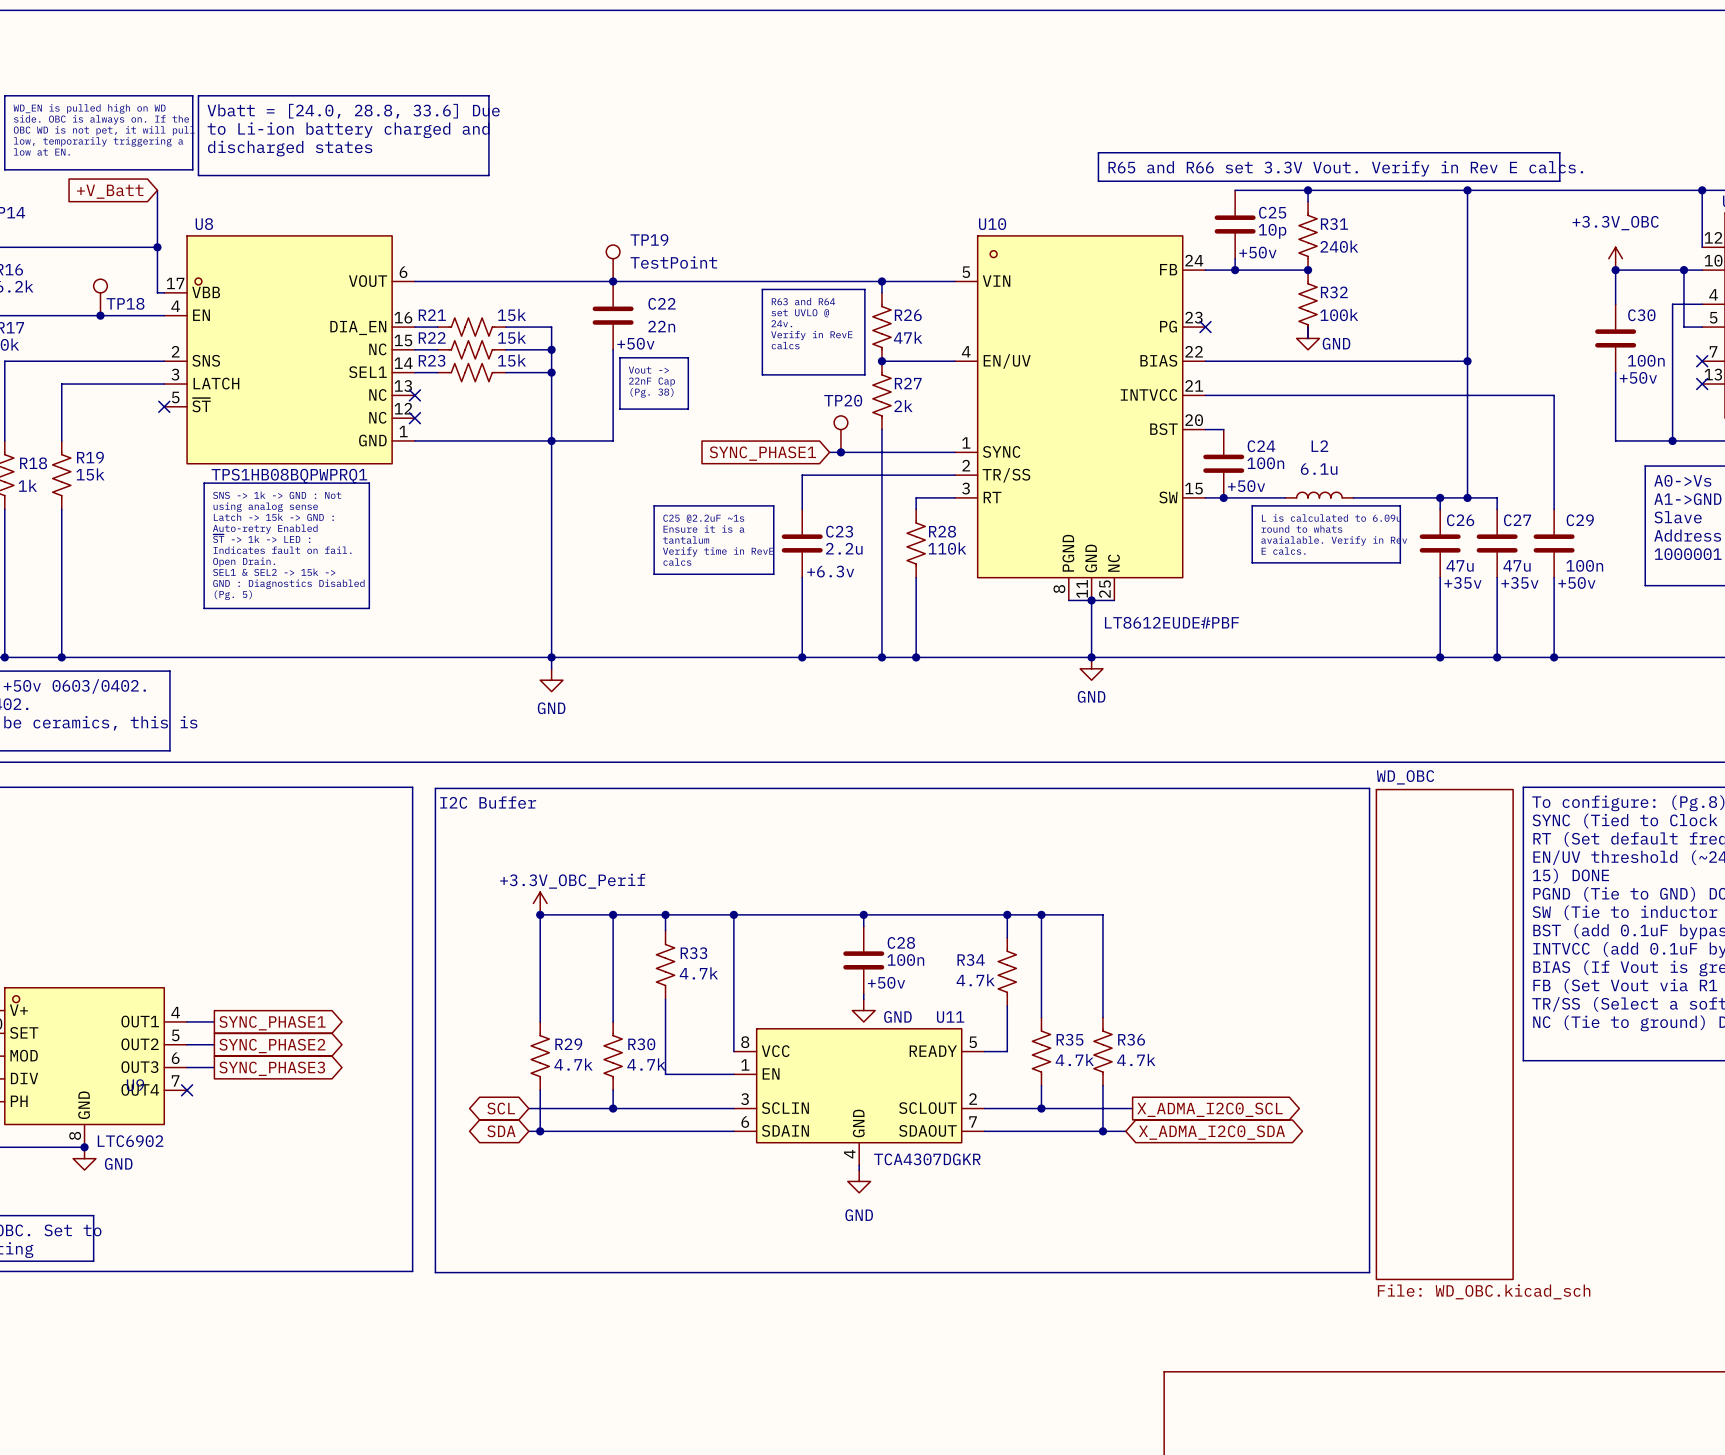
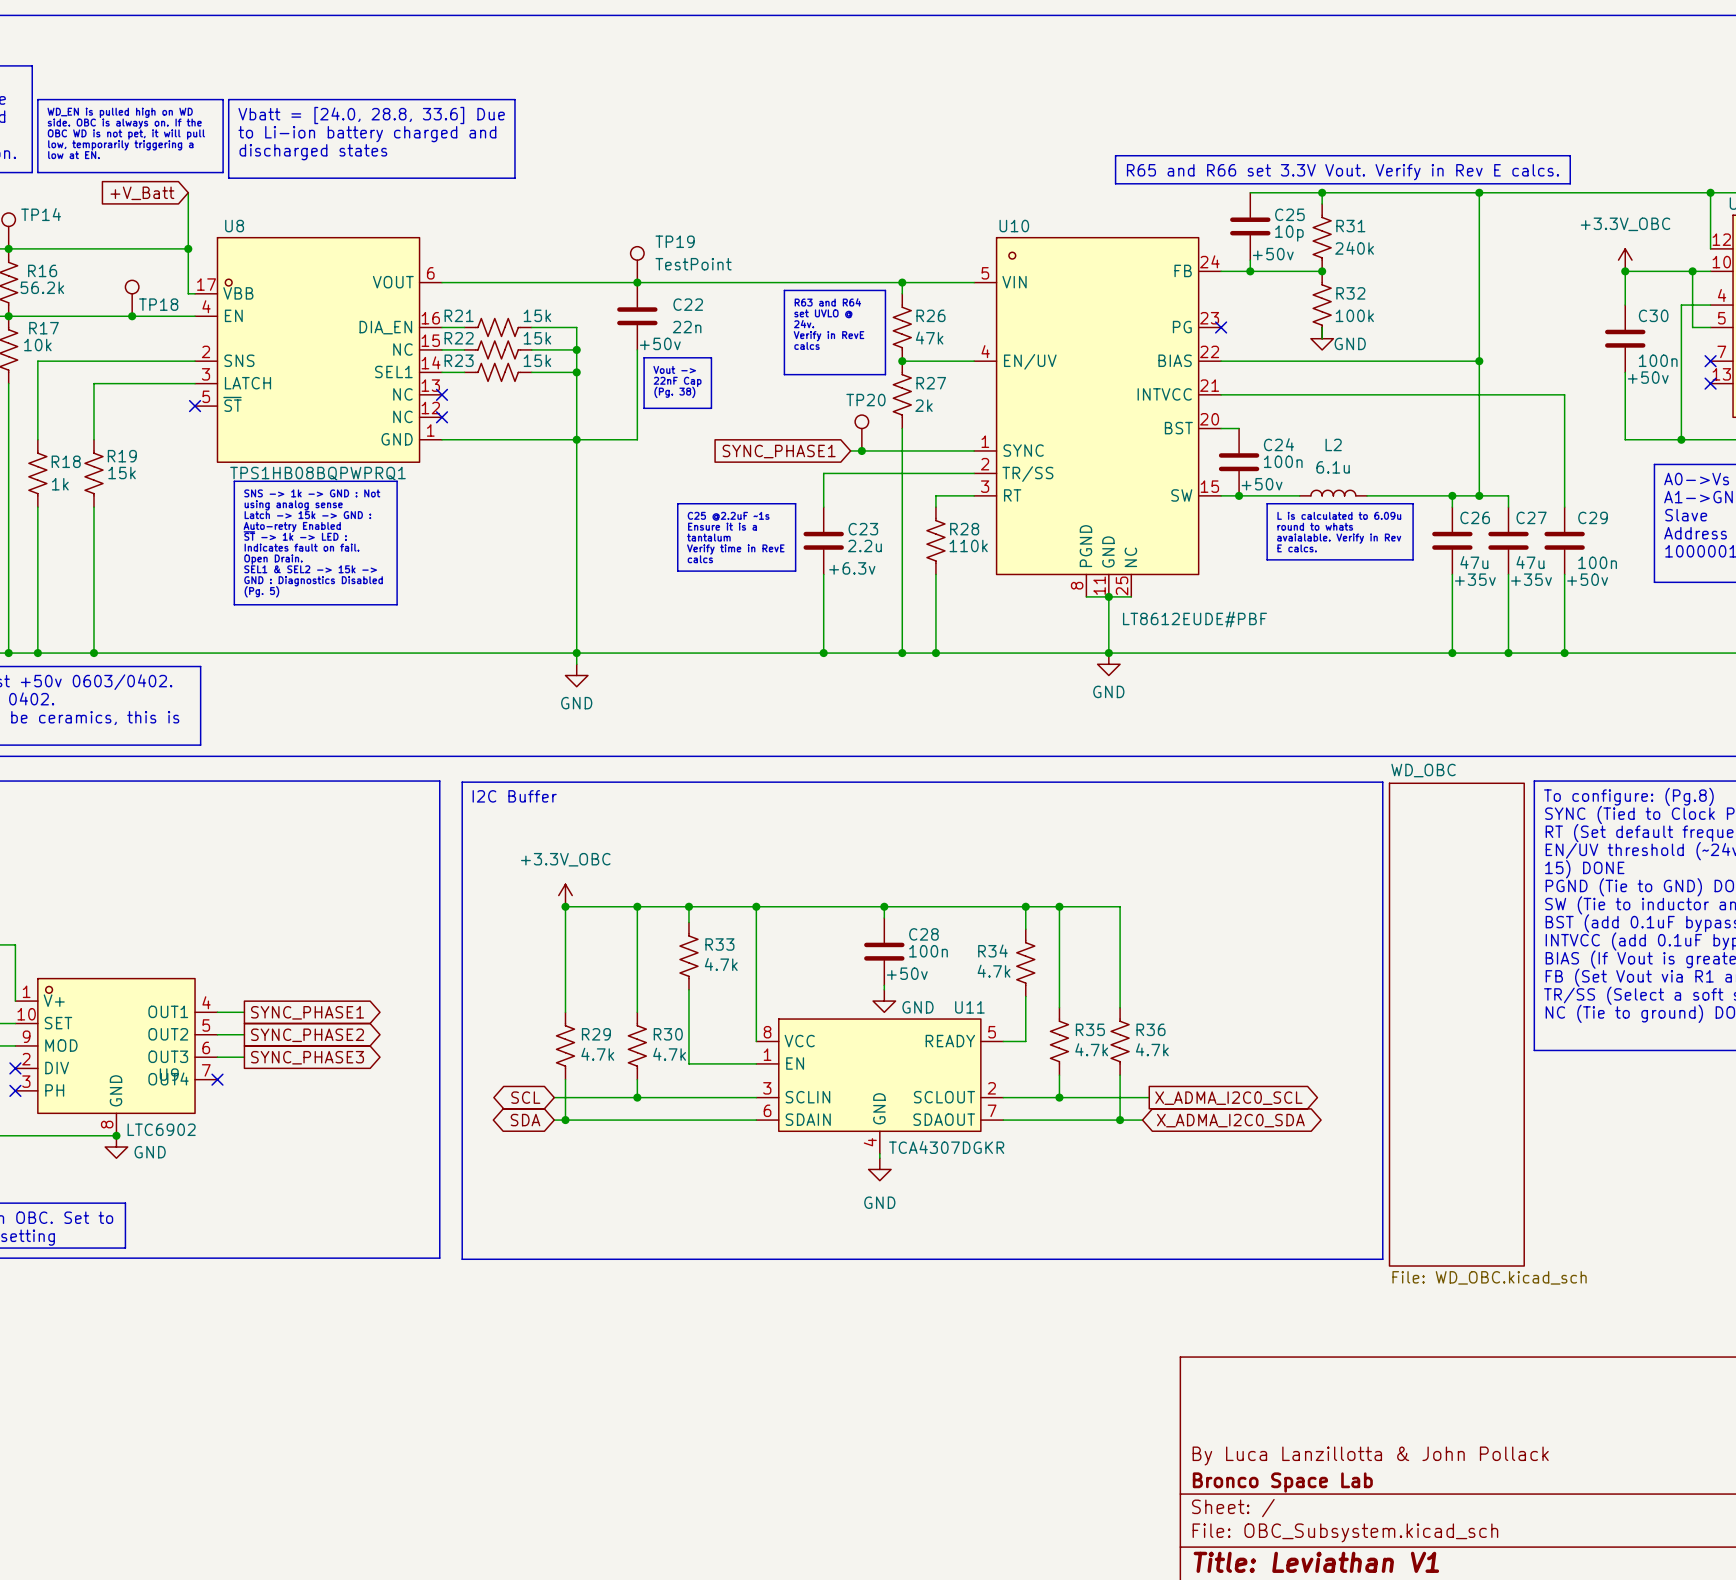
power symbol: +3.3V_OBC_Perif (540, 903) -> +3.3V_OBC (565, 895)

